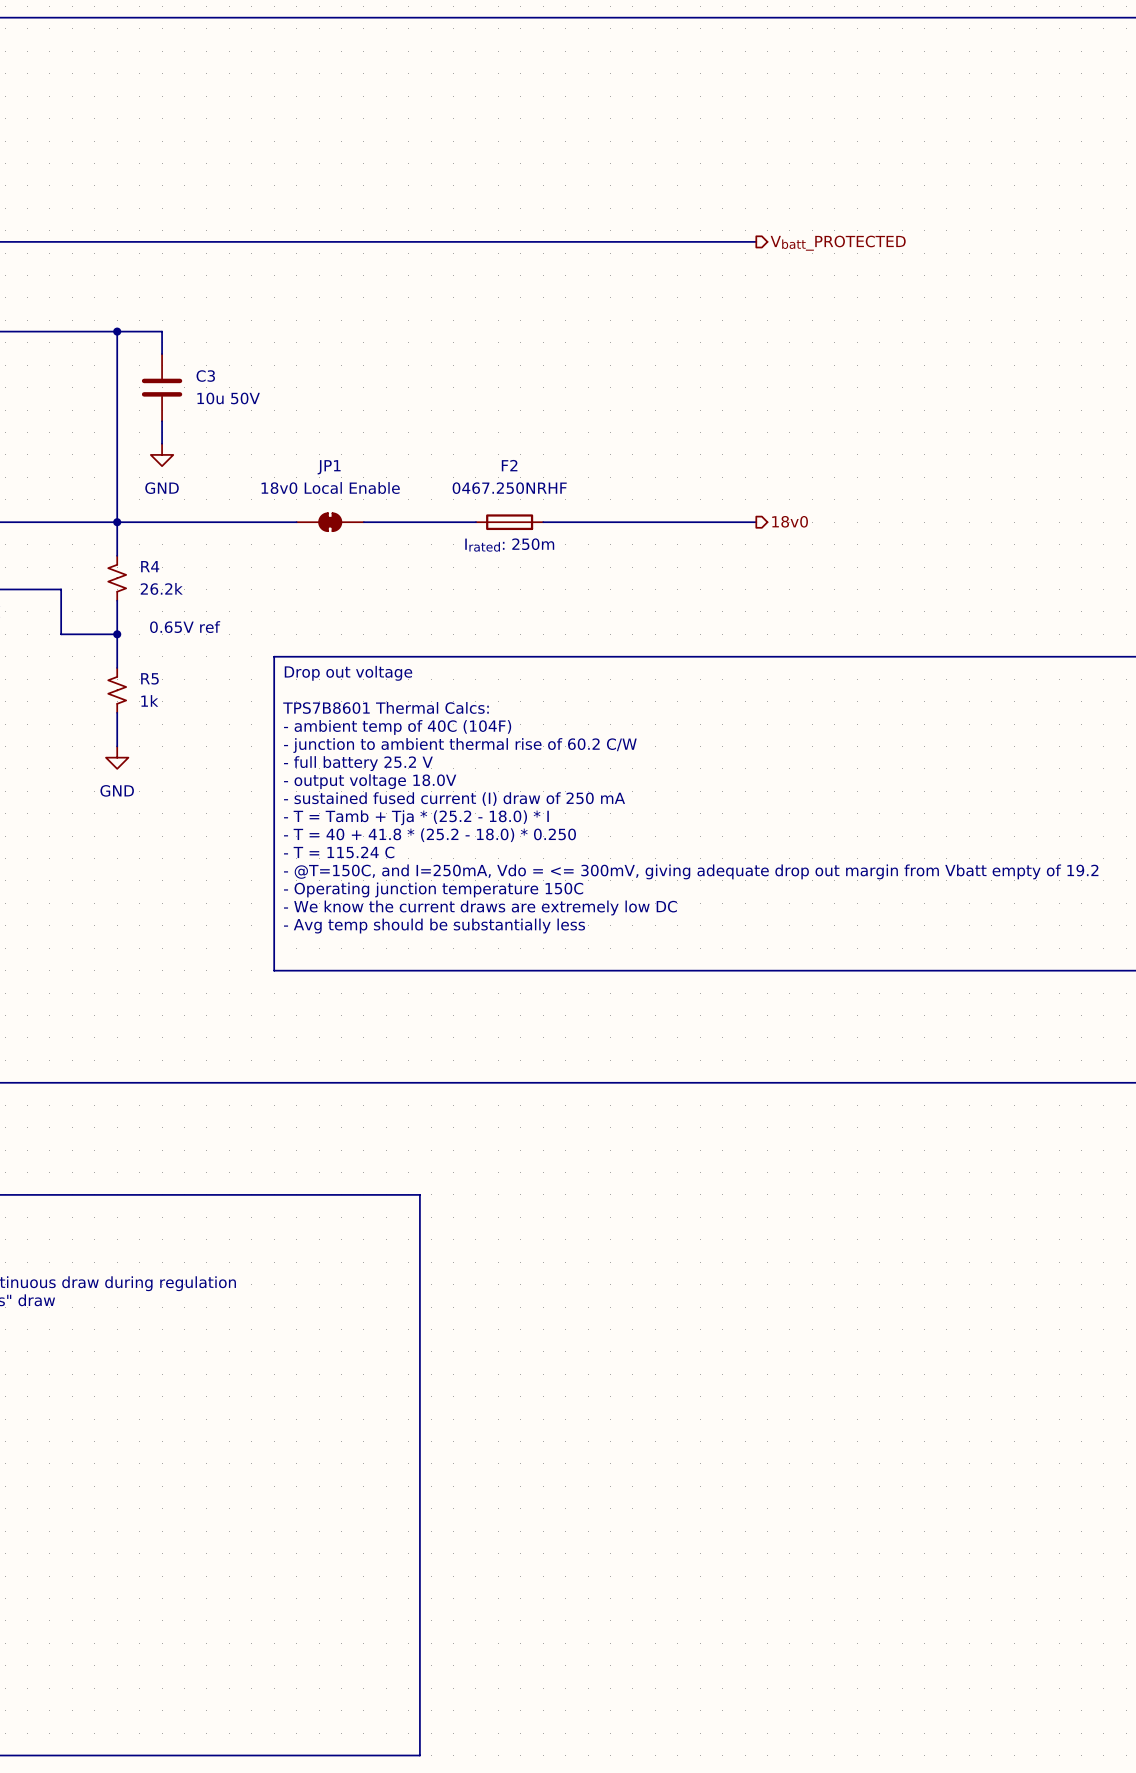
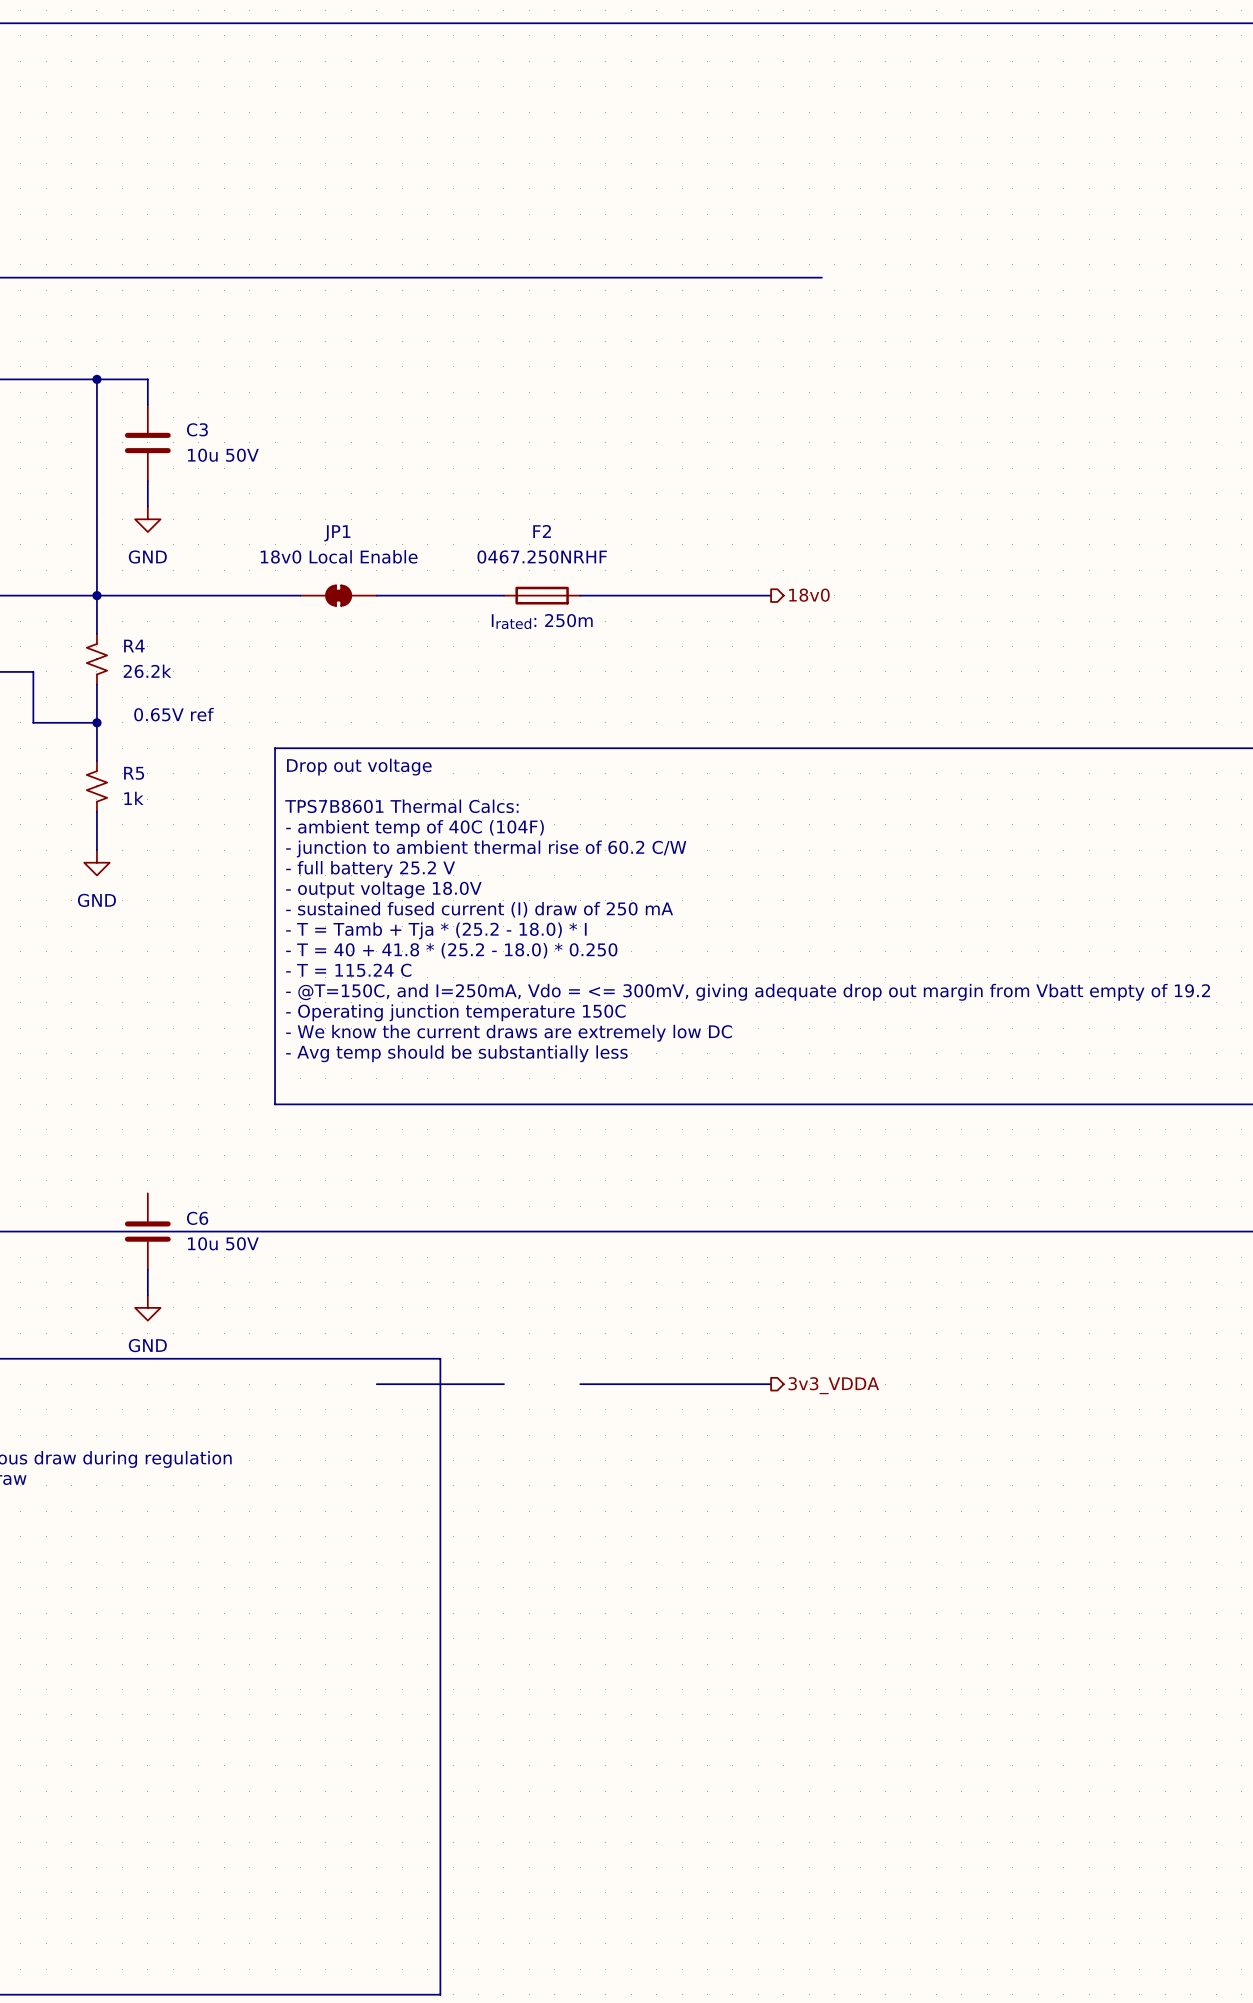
hierarchical label: Vbatt_PROTECTED (838, 243) -> none
hierarchical label position: 18v0 (790, 521) -> 18v0 (809, 595)
wire: (711, 522) (756, 522) -> none
C6: none -> 10u 50V (147, 1231)
wire: none -> (147, 1269) (147, 1295)
power symbol: none -> GND (147, 1307)
wire: none -> (376, 1384) (503, 1384)
wire: none -> (580, 1384) (771, 1384)
hierarchical label: none -> 3v3_VDDA (833, 1385)

